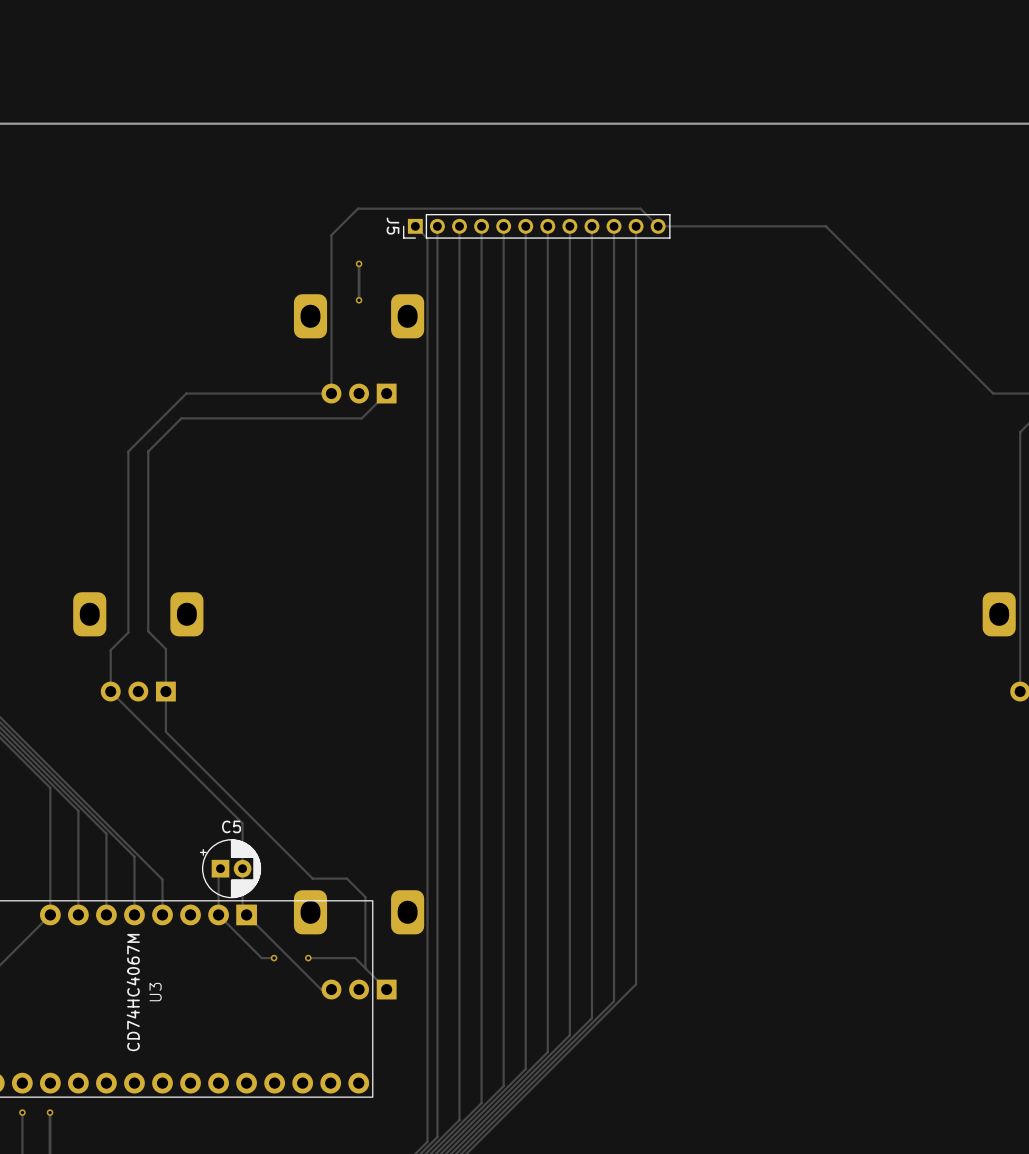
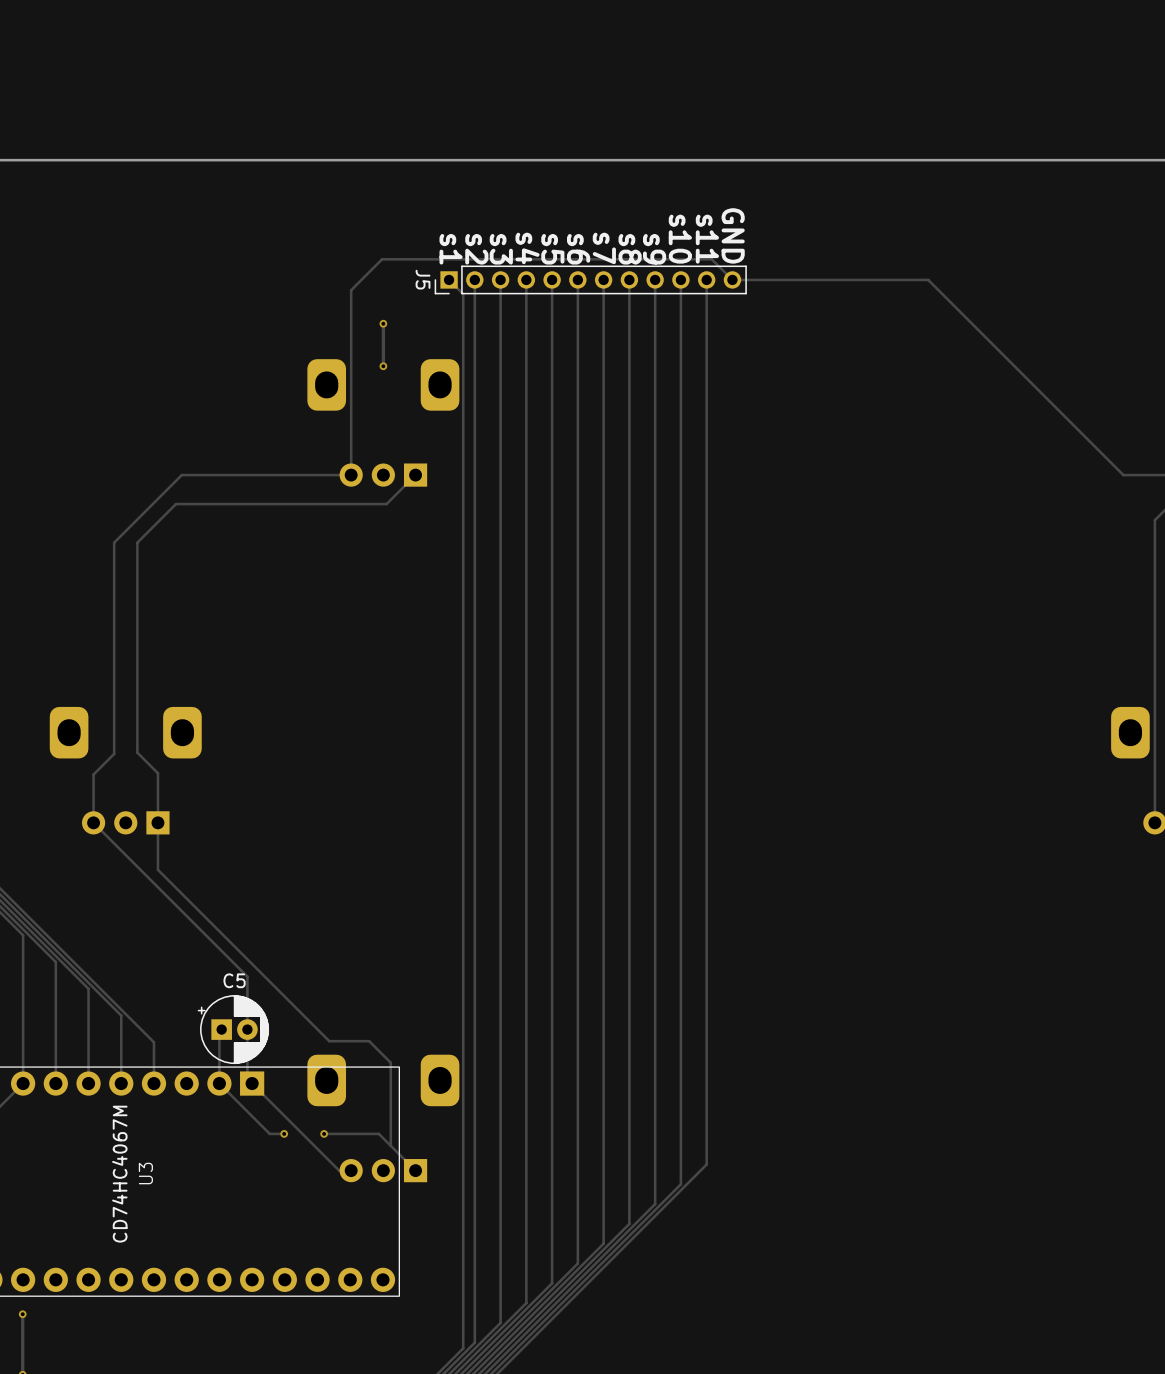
text: none -> GND (733, 235)
text: none -> s10 (680, 239)
text: none -> s11 (707, 239)
text: none -> s4 (527, 248)
text: none -> s7 (604, 248)
text: none -> s1 (451, 249)
text: none -> s2 (476, 249)
text: none -> s3 (501, 249)
text: none -> s5 (552, 249)
text: none -> s6 (578, 249)
text: none -> s8 (630, 249)
text: none -> s9 (654, 249)

